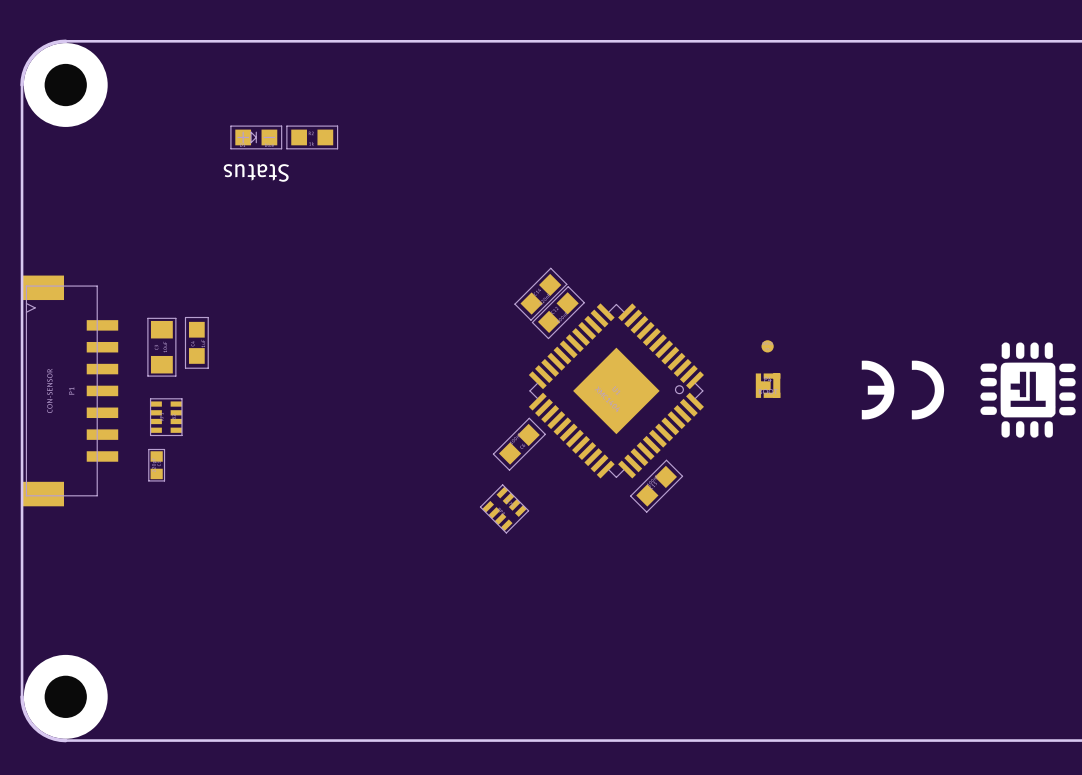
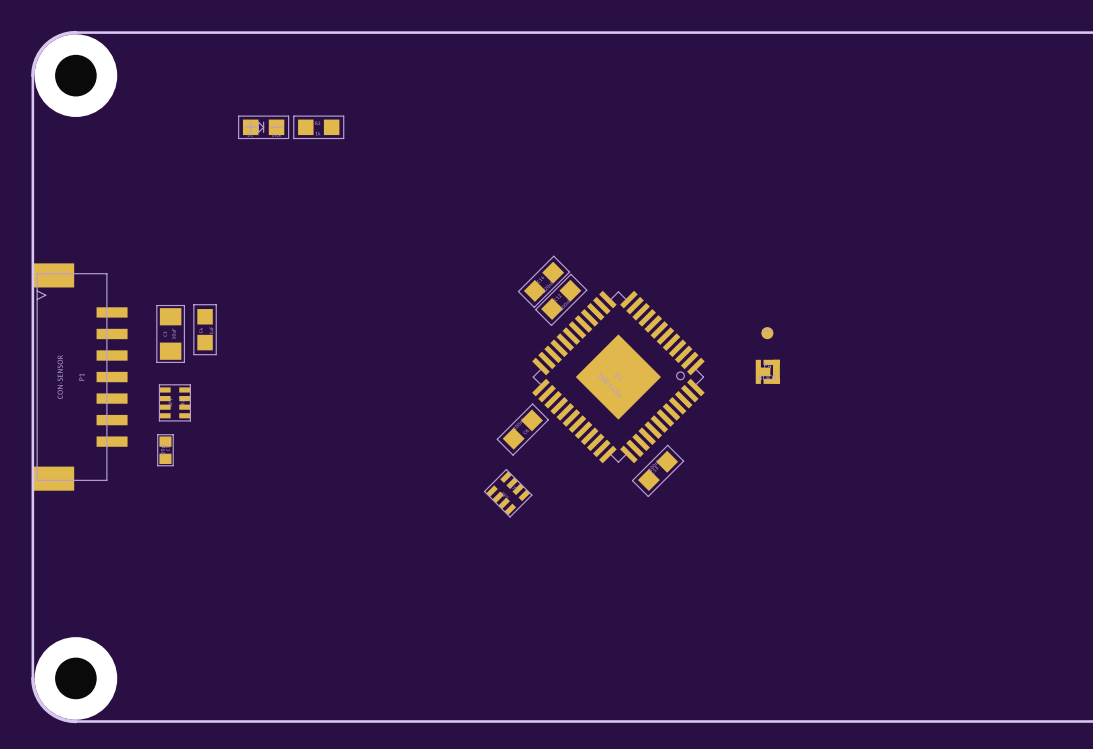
text: Status (256, 172) -> none
drawing: [980, 342, 1076, 438] -> none
drawing: [861, 360, 945, 420] -> none

